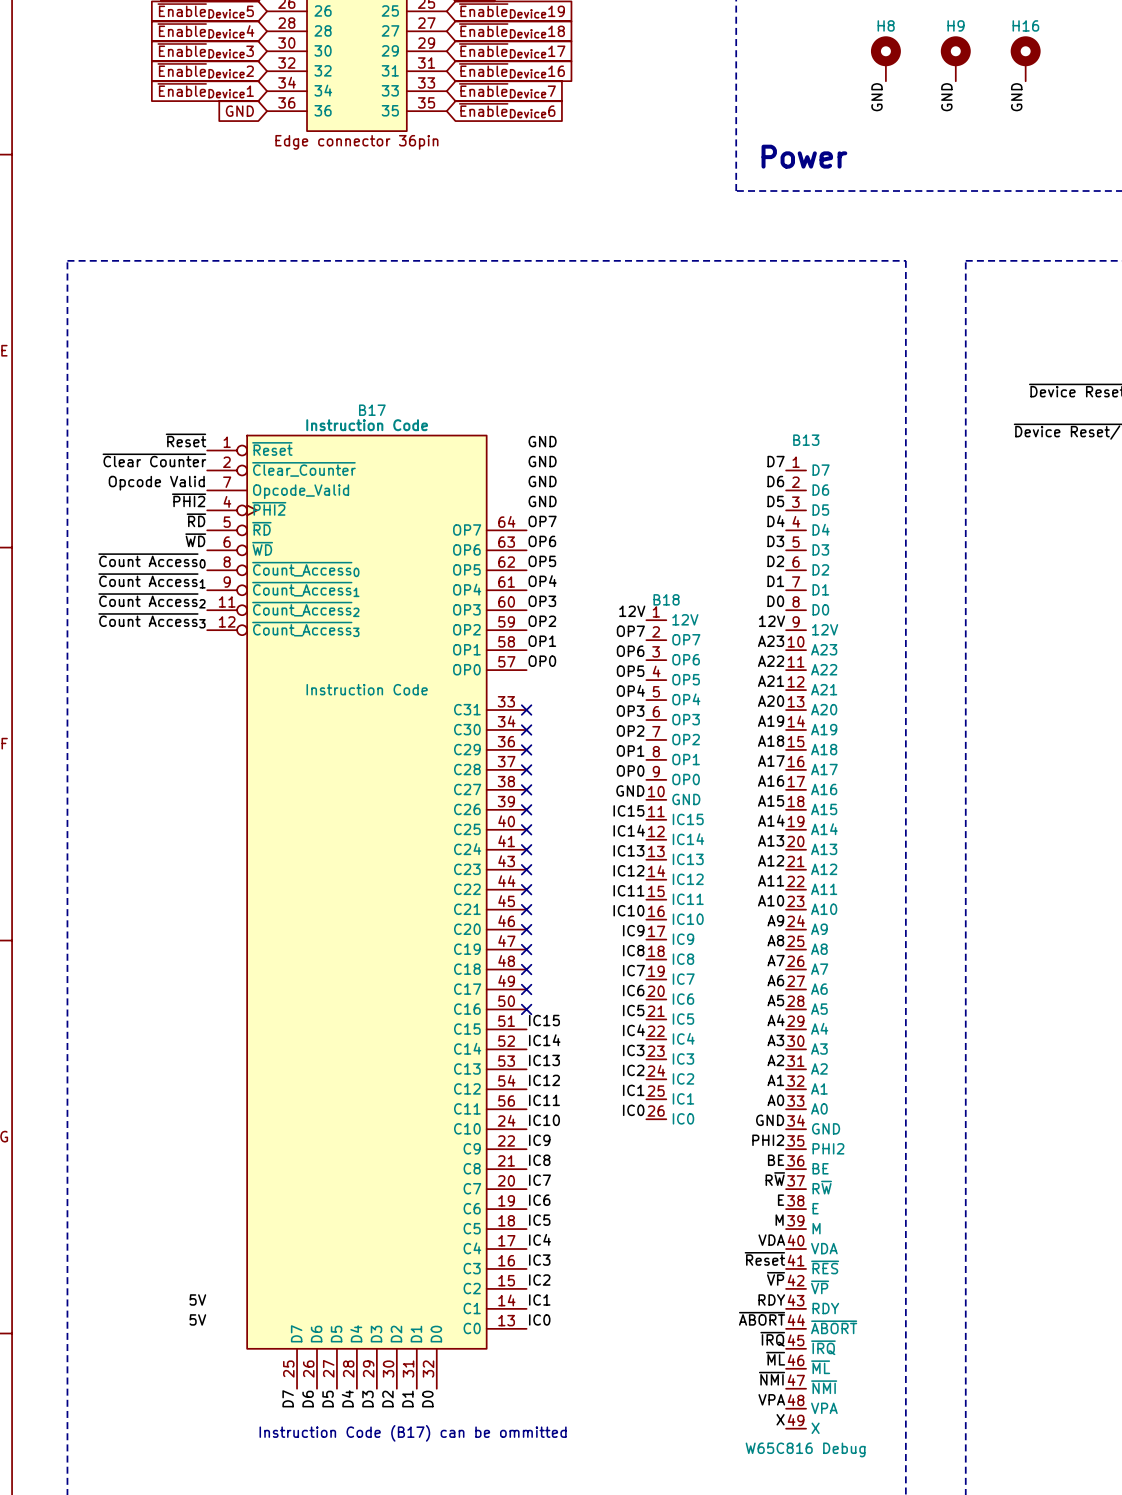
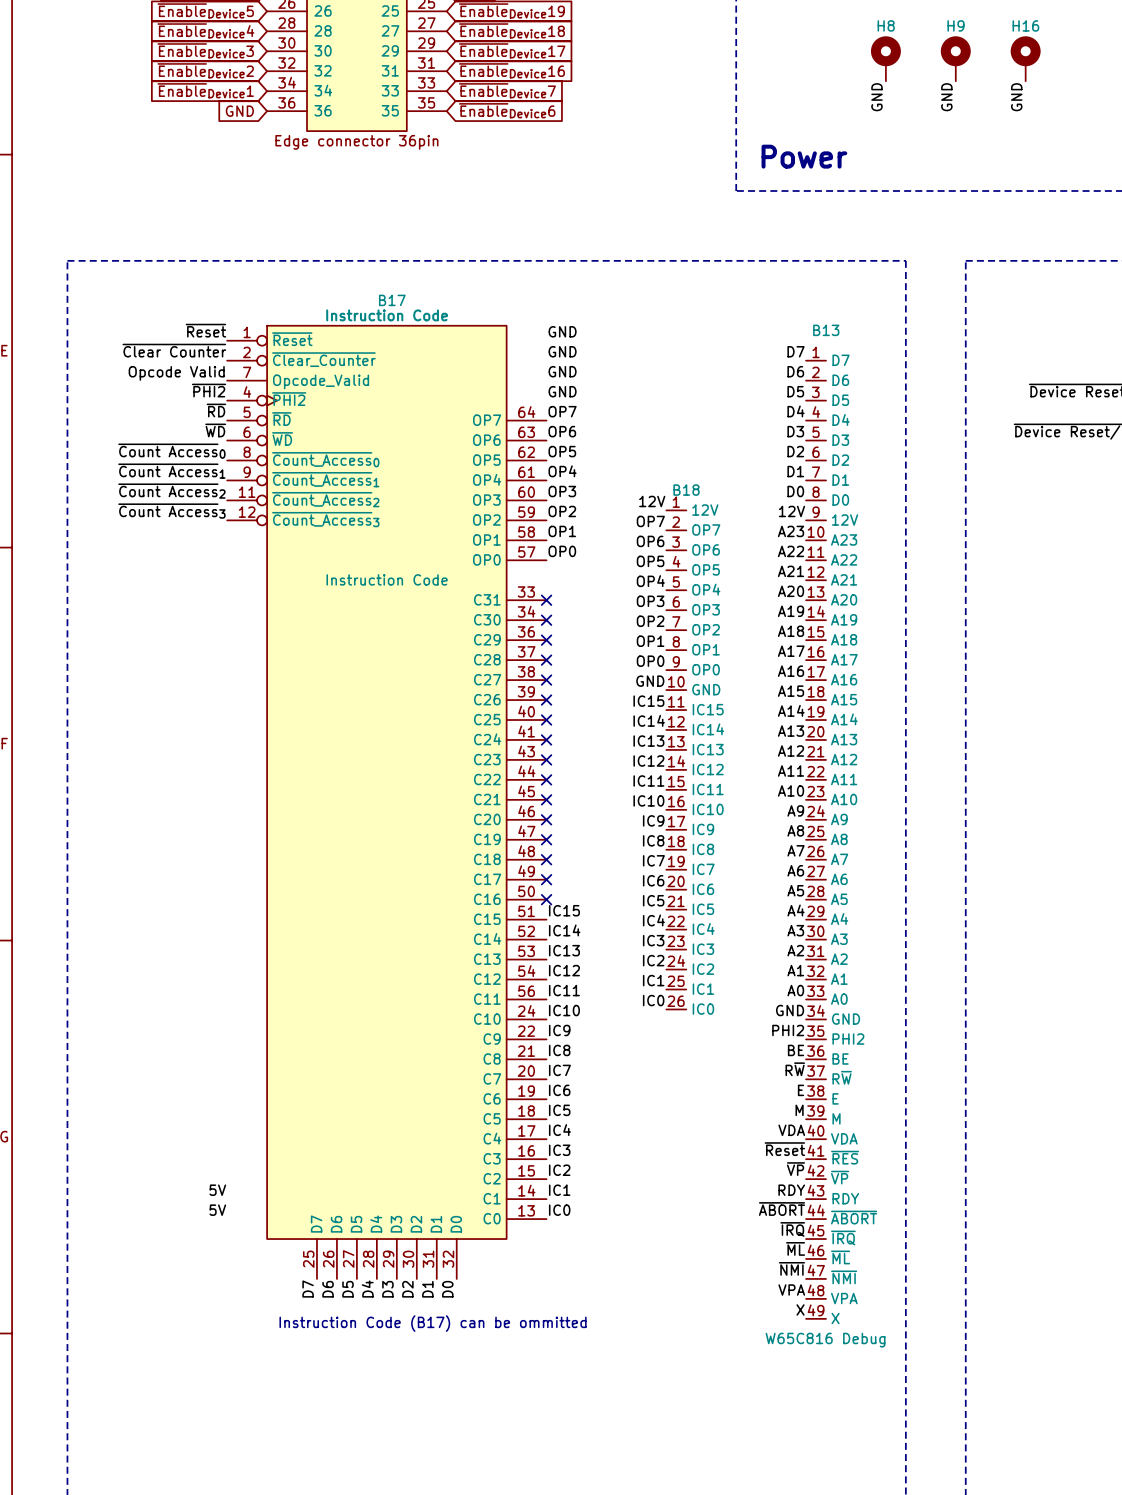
label: none -> GND (562, 331)
label: none -> GND (562, 351)
label: none -> GND (562, 371)
label: none -> GND (562, 391)
label: none -> OP7 (562, 411)
label: none -> OP6 (562, 431)
label position: ~{Reset} (185, 440) -> ~{Reset} (205, 330)
label: GND (542, 441) -> none
label: none -> OP5 (562, 451)
label position: ~{Clear Counter} (154, 460) -> ~{Clear Counter} (174, 350)
label: GND (542, 461) -> none
label position: D7 (776, 461) -> D7 (796, 351)
label: none -> OP4 (562, 471)
label: GND (542, 481) -> none
label position: D6 (775, 481) -> D6 (795, 371)
label position: Opcode Valid (156, 483) -> Opcode Valid (176, 373)
label: none -> OP3 (562, 491)
label position: ~{PHI2} (189, 500) -> ~{PHI2} (209, 390)
label: GND (542, 501) -> none
label: none -> 12V (652, 501)
label position: D5 (775, 501) -> D5 (795, 391)
label: none -> OP2 (562, 511)
label: none -> 12V (791, 511)
label position: ~{RD} (196, 520) -> ~{RD} (216, 410)
label: OP7 (542, 521) -> none
label: none -> OP7 (650, 521)
label position: D4 (776, 521) -> D4 (796, 411)
label: none -> OP1 (562, 531)
label position: ~{WD} (195, 540) -> ~{WD} (215, 430)
label: OP6 (542, 541) -> none
label: none -> OP6 (650, 541)
label position: D3 (775, 541) -> D3 (795, 431)
label: none -> OP0 (562, 551)
label position: ~{Count Access}0 (151, 560) -> ~{Count Access}0 (171, 451)
label: OP5 (542, 561) -> none
label: none -> OP5 (650, 561)
label position: D2 (775, 561) -> D2 (795, 451)
label position: ~{Count Access}1 (151, 580) -> ~{Count Access}1 (171, 471)
label: OP4 (542, 581) -> none
label: none -> OP4 (650, 581)
label position: D1 (775, 581) -> D1 (795, 471)
label position: ~{Count Access}2 (151, 600) -> ~{Count Access}2 (171, 491)
no-connect mark: none -> (546, 600)
label: OP3 (542, 601) -> none
label: none -> OP3 (650, 601)
label position: D0 (775, 601) -> D0 (795, 491)
label: 12V (632, 611) -> none
label position: ~{Count Access}3 (151, 620) -> ~{Count Access}3 (171, 511)
no-connect mark: none -> (546, 620)
label: OP2 (542, 621) -> none
label: none -> OP2 (650, 621)
label: 12V (772, 621) -> none
label: OP7 (630, 631) -> none
no-connect mark: none -> (546, 640)
label: OP1 (542, 641) -> none
label: none -> OP1 (650, 641)
label position: A23 (771, 641) -> A23 (791, 531)
label: OP6 (630, 651) -> none
no-connect mark: none -> (546, 660)
label: OP0 (542, 661) -> none
label: none -> OP0 (650, 661)
label position: A22 (771, 661) -> A22 (791, 551)
label: OP5 (630, 671) -> none
no-connect mark: none -> (546, 680)
label position: A21 (771, 681) -> A21 (791, 571)
label: OP4 (630, 690) -> none
no-connect mark: none -> (546, 700)
label: none -> IC15 (648, 701)
label position: A20 (771, 701) -> A20 (791, 591)
no-connect mark: (526, 710) -> none
label: OP3 (630, 711) -> none
no-connect mark: none -> (546, 720)
label: none -> IC14 (649, 720)
label position: A19 (771, 721) -> A19 (791, 611)
no-connect mark: (526, 729) -> none
label: OP2 (630, 731) -> none
no-connect mark: none -> (546, 739)
label: none -> IC13 (648, 741)
label position: A18 (771, 741) -> A18 (791, 631)
no-connect mark: (526, 749) -> none
label: OP1 (630, 751) -> none
no-connect mark: none -> (546, 759)
label: none -> IC12 (648, 761)
label position: A17 (771, 761) -> A17 (791, 651)
no-connect mark: (526, 769) -> none
label: OP0 (630, 770) -> none
no-connect mark: none -> (546, 779)
label: none -> IC11 (648, 780)
label position: A16 (771, 780) -> A16 (791, 671)
no-connect mark: (526, 789) -> none
label position: GND (630, 790) -> GND (650, 681)
no-connect mark: none -> (546, 799)
label position: A15 (771, 800) -> A15 (791, 691)
no-connect mark: (526, 809) -> none
label: IC15 (628, 810) -> IC10 (648, 800)
no-connect mark: none -> (546, 819)
label: none -> IC9 (653, 820)
label position: A14 (771, 820) -> A14 (791, 710)
no-connect mark: (526, 829) -> none
label: IC14 (629, 830) -> none
no-connect mark: none -> (546, 839)
label: none -> IC8 (653, 840)
label position: A13 (771, 840) -> A13 (791, 731)
no-connect mark: (526, 849) -> none
label: IC13 (628, 850) -> none
no-connect mark: none -> (546, 859)
label: none -> IC7 (653, 860)
label position: A12 (771, 860) -> A12 (791, 751)
no-connect mark: (526, 869) -> none
B18 position: (656, 869) -> (676, 759)
label: IC12 (628, 870) -> none
no-connect mark: none -> (546, 879)
label: none -> IC6 (653, 880)
label position: A11 (771, 880) -> A11 (791, 770)
no-connect mark: (526, 889) -> none
label: IC11 (628, 890) -> none
no-connect mark: none -> (546, 899)
label: none -> IC5 (653, 900)
label position: A10 (771, 900) -> A10 (791, 790)
no-connect mark: (526, 909) -> none
label: none -> IC15 (564, 910)
label: IC10 (628, 910) -> none
B17 position: (366, 911) -> (386, 802)
label: none -> IC4 (653, 920)
label position: A9 (775, 920) -> A9 (795, 810)
no-connect mark: (526, 929) -> none
label: none -> IC14 (564, 930)
label: IC9 (633, 930) -> none
label: none -> IC3 (653, 940)
label position: A8 (775, 940) -> A8 (795, 830)
no-connect mark: (526, 949) -> none
B13 position: (796, 949) -> (816, 839)
label: none -> IC13 (564, 950)
label: IC8 (633, 950) -> none
label: none -> IC2 (653, 960)
label position: A7 (776, 960) -> A7 (796, 850)
no-connect mark: (526, 969) -> none
label: none -> IC12 (564, 970)
label: IC7 (633, 970) -> none
label: none -> IC1 (653, 980)
label position: A6 (775, 980) -> A6 (795, 870)
no-connect mark: (526, 989) -> none
label: none -> IC11 (564, 990)
label: IC6 (633, 990) -> none
label: none -> IC0 (653, 1000)
label position: A5 (775, 1000) -> A5 (795, 890)
no-connect mark: (526, 1009) -> none
label: IC5 (633, 1010) -> none
label: IC15 (544, 1020) -> IC10 (564, 1010)
label position: A4 (776, 1020) -> A4 (796, 910)
label: none -> IC9 (559, 1030)
label: IC4 (633, 1030) -> none
label: IC14 (544, 1040) -> none
label position: A3 (775, 1040) -> A3 (795, 930)
label: none -> IC8 (559, 1050)
label: IC3 (633, 1050) -> none
label: IC13 (544, 1060) -> none
label position: A2 (775, 1060) -> A2 (795, 950)
label: none -> IC7 (559, 1070)
label: IC2 (633, 1070) -> none
label: IC12 (544, 1080) -> none
label position: A1 (775, 1080) -> A1 (795, 970)
label: none -> IC6 (559, 1090)
label: IC1 (633, 1090) -> none
label: IC11 (544, 1100) -> none
label position: A0 (775, 1100) -> A0 (795, 990)
label: none -> IC5 (559, 1110)
label: IC0 (633, 1110) -> none
label: IC10 (544, 1120) -> none
label position: GND (770, 1120) -> GND (790, 1010)
label: none -> IC4 (559, 1130)
label: IC9 (539, 1140) -> none
label position: PHI2 (768, 1140) -> PHI2 (788, 1030)
label: none -> IC3 (559, 1150)
label: IC8 (539, 1160) -> none
label position: BE (776, 1160) -> BE (796, 1050)
label: none -> IC2 (559, 1170)
label position: R~{W} (775, 1179) -> R~{W} (795, 1069)
label: IC7 (539, 1180) -> none
label: none -> 5V (217, 1190)
label: none -> IC1 (559, 1190)
label: IC6 (539, 1200) -> none
label position: E (781, 1200) -> E (801, 1090)
label: none -> 5V (217, 1210)
label: none -> IC0 (559, 1210)
label: IC5 (539, 1220) -> none
label position: M (779, 1220) -> M (799, 1110)
label: IC4 (539, 1239) -> none
label position: VDA (771, 1240) -> VDA (791, 1130)
label position: ~{Reset} (764, 1258) -> ~{Reset} (784, 1149)
label: IC3 (539, 1260) -> none
label position: ~{VP} (776, 1278) -> ~{VP} (795, 1169)
label: IC2 (539, 1280) -> none
label: 5V (197, 1299) -> none
label: IC1 (539, 1299) -> none
label position: RDY (771, 1299) -> RDY (791, 1190)
label position: ~{ABORT} (762, 1318) -> ~{ABORT} (781, 1209)
label: 5V (197, 1319) -> none
label: IC0 (539, 1319) -> none
label position: ~{IRQ} (772, 1339) -> ~{IRQ} (792, 1229)
label position: ~{ML} (775, 1358) -> ~{ML} (795, 1248)
label position: ~{NMI} (772, 1378) -> ~{NMI} (791, 1268)
label position: D7 (288, 1398) -> D7 (308, 1289)
label position: D4 (347, 1398) -> D4 (367, 1289)
label position: D6 (308, 1399) -> D6 (328, 1289)
label position: D5 (328, 1399) -> D5 (348, 1289)
label position: D3 (367, 1399) -> D3 (387, 1289)
label position: D2 (387, 1399) -> D2 (407, 1289)
label position: D1 (407, 1399) -> D1 (427, 1289)
label position: D0 (427, 1399) -> D0 (447, 1289)
label position: VPA (771, 1399) -> VPA (791, 1290)
label position: X (780, 1419) -> X (800, 1309)
text position: Instruction Code (B17) can be ommitted (413, 1433) -> Instruction Code (B17) can be ommitted (433, 1323)

